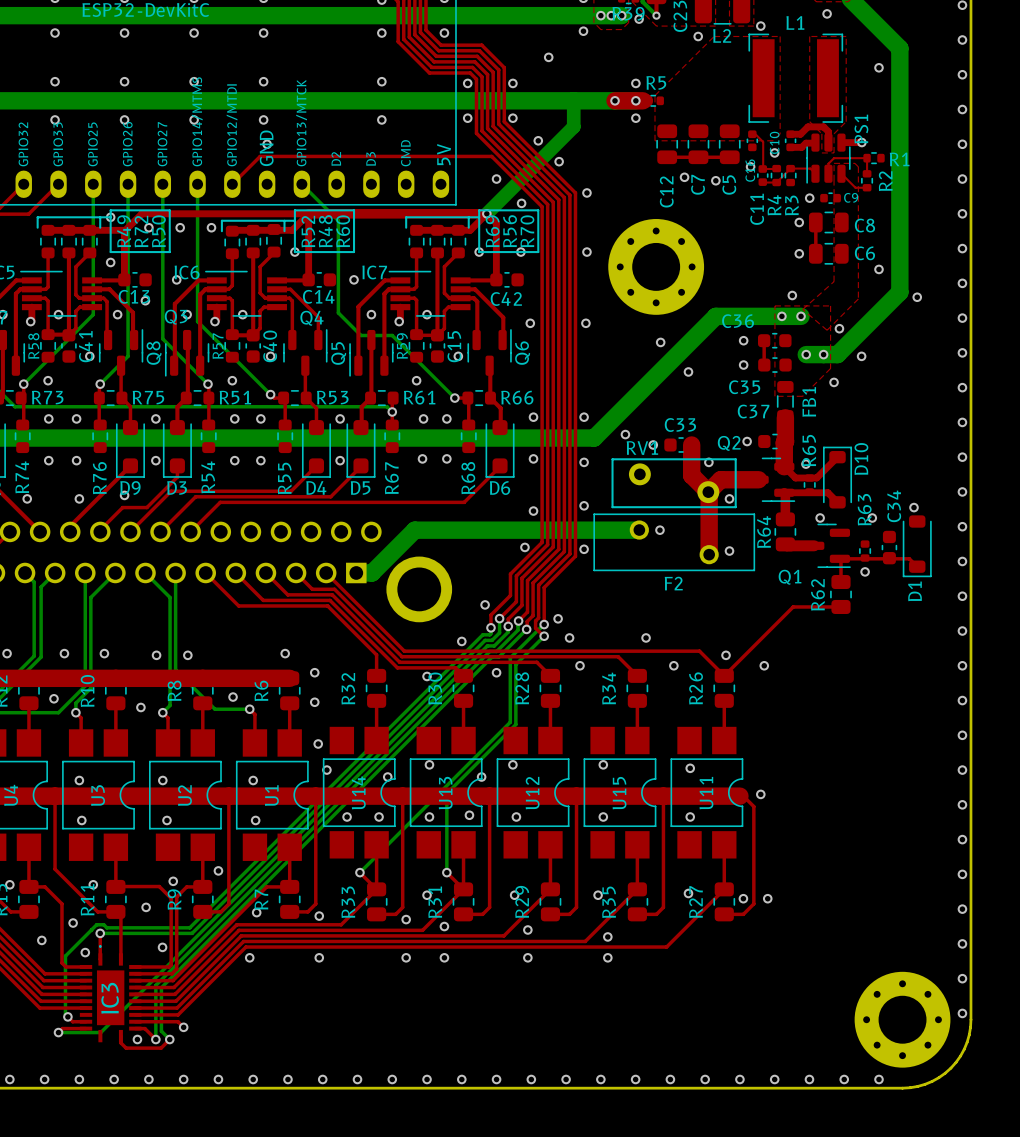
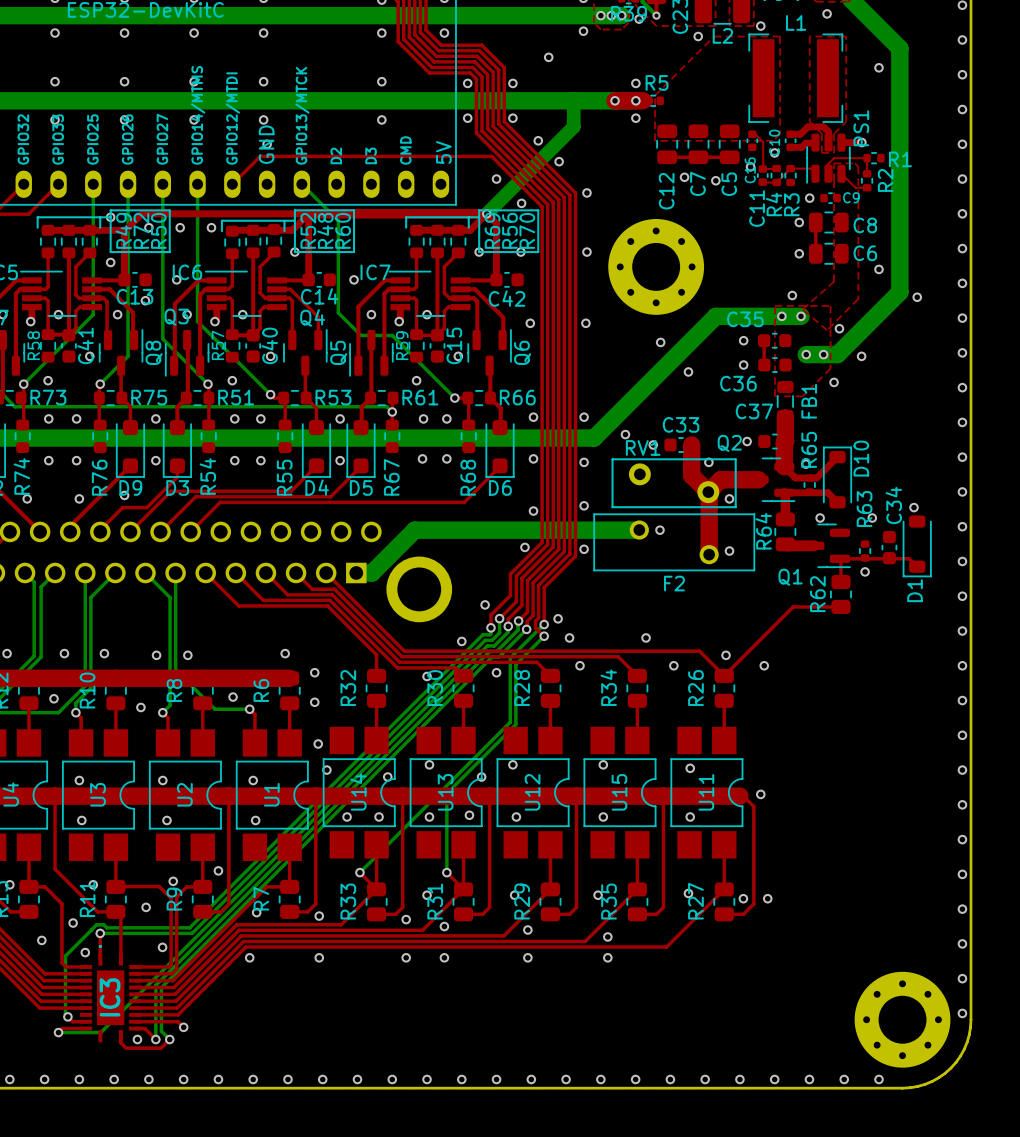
C36 name position: C36 (738, 321) -> C36 (738, 383)
C35 name position: C35 (744, 387) -> C35 (745, 319)

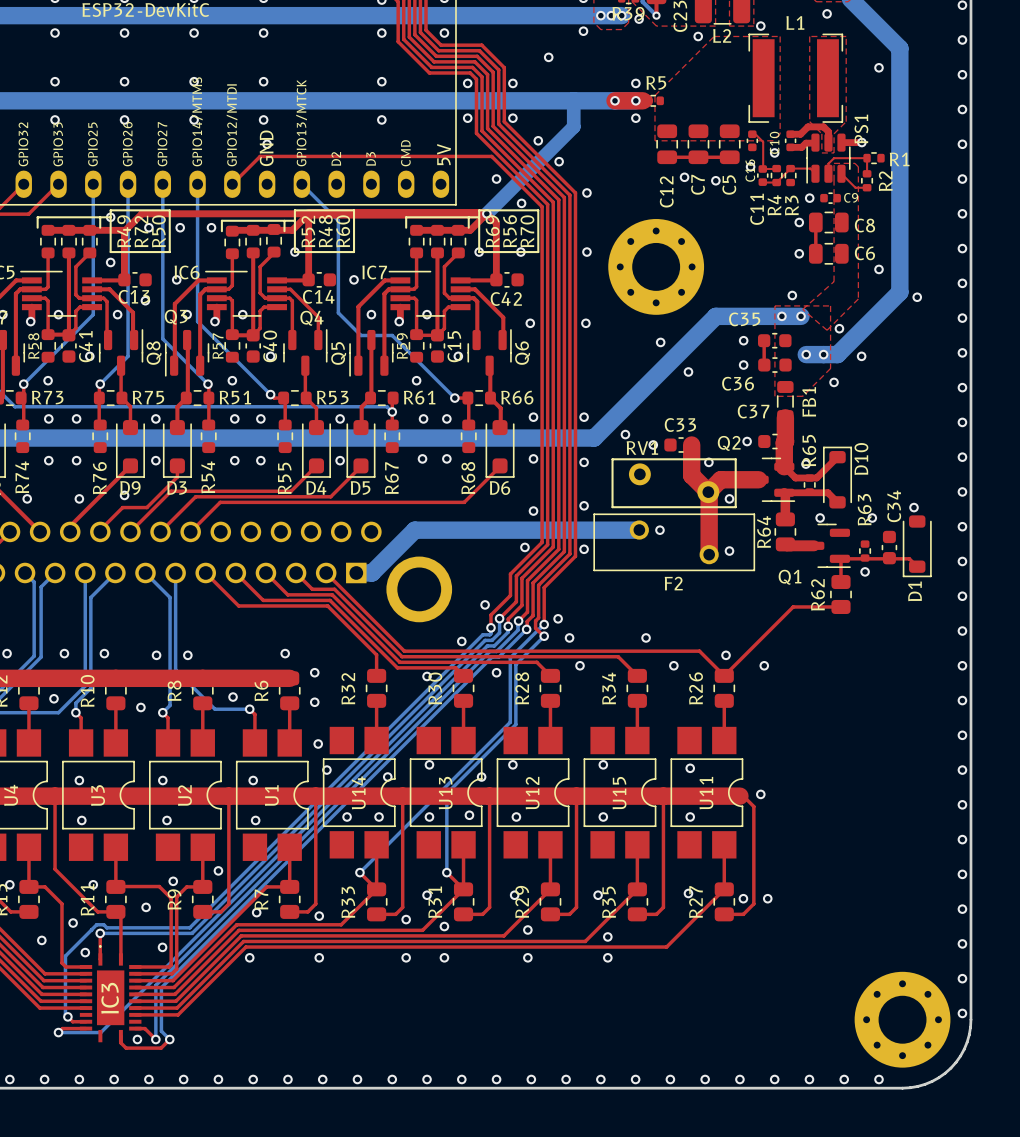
top track: (135, 1021) (178, 1021) (183, 1027) -> none
via: (183, 1027) -> none

